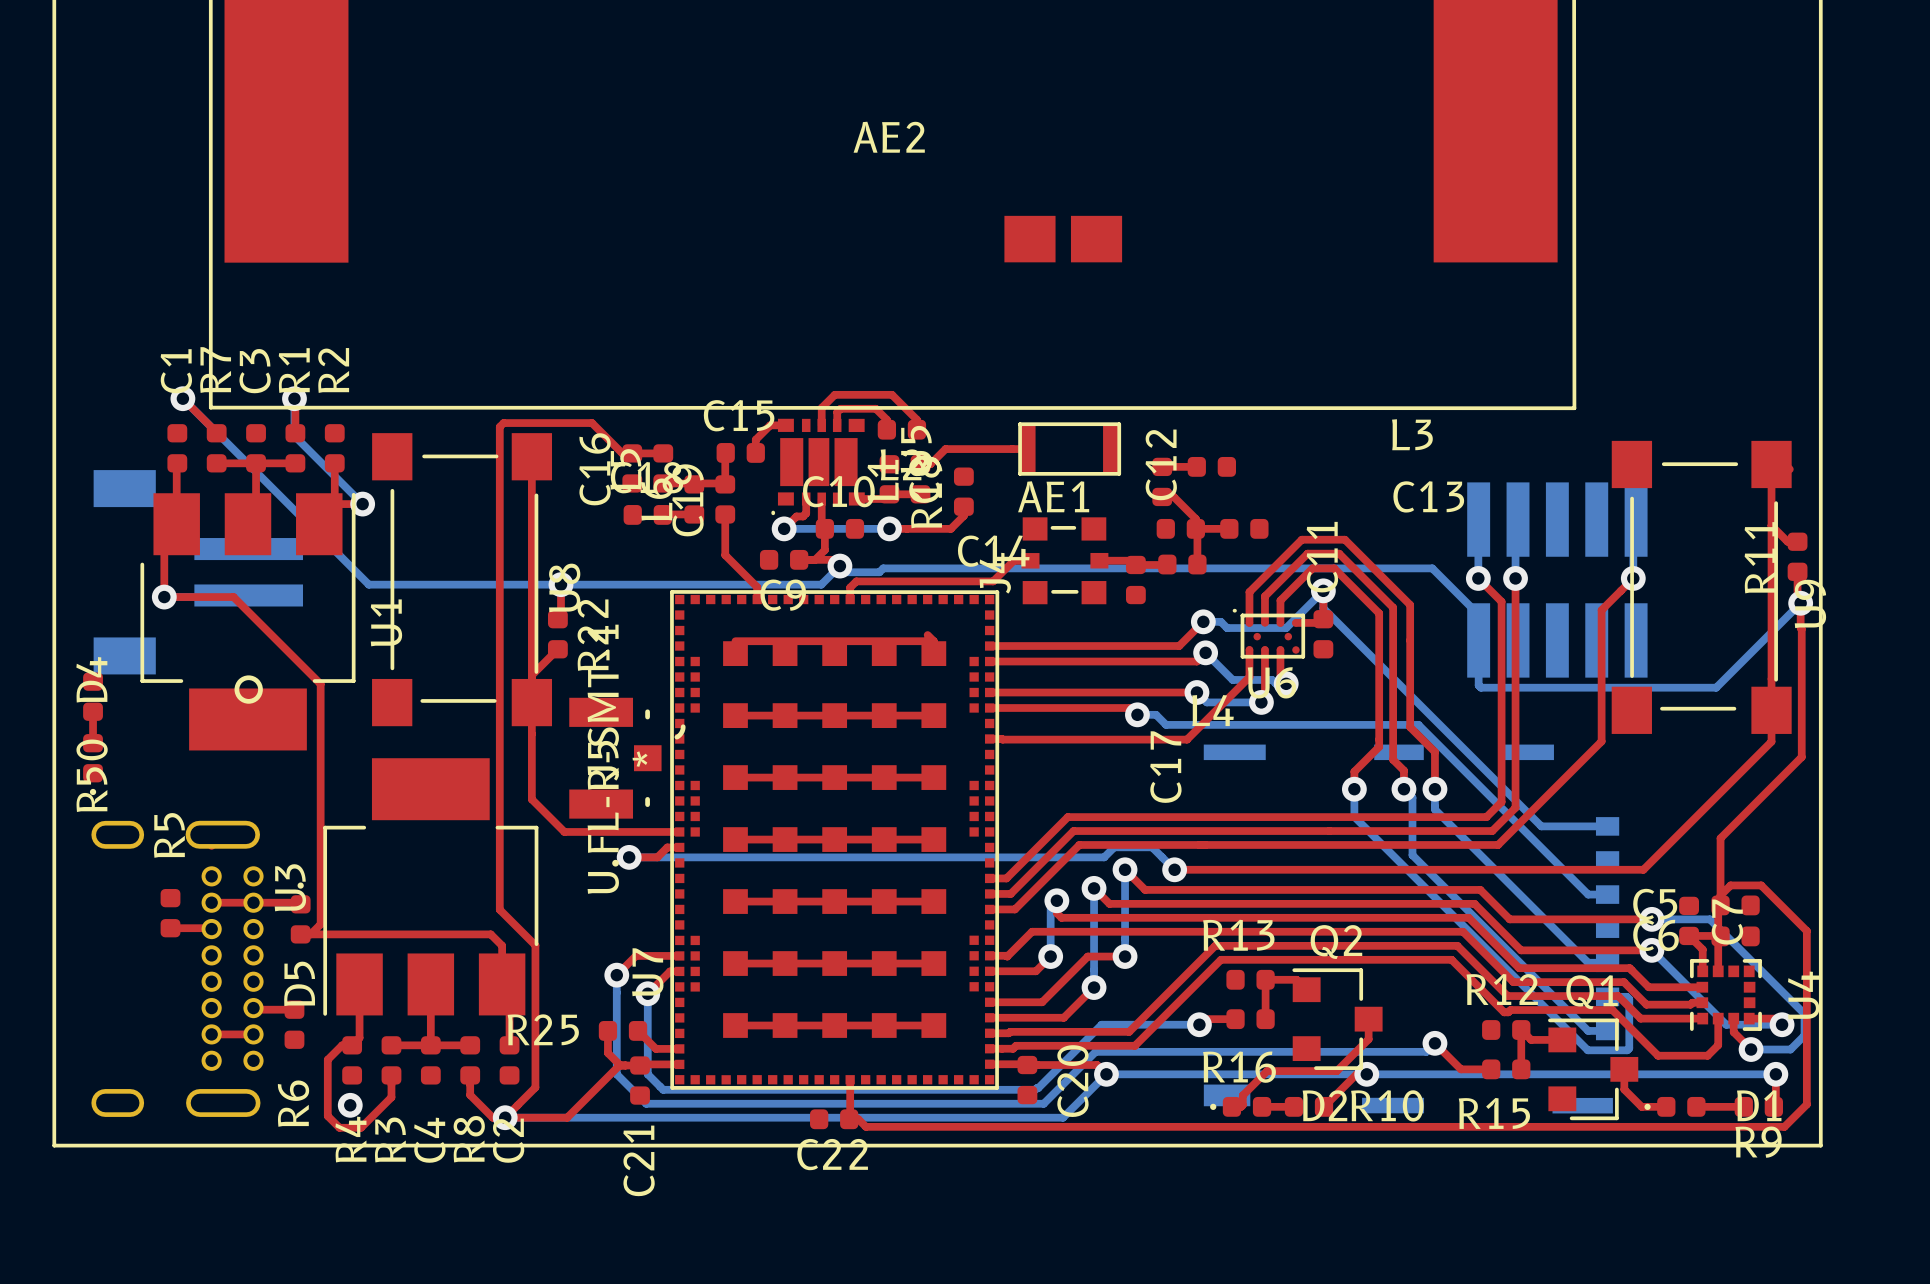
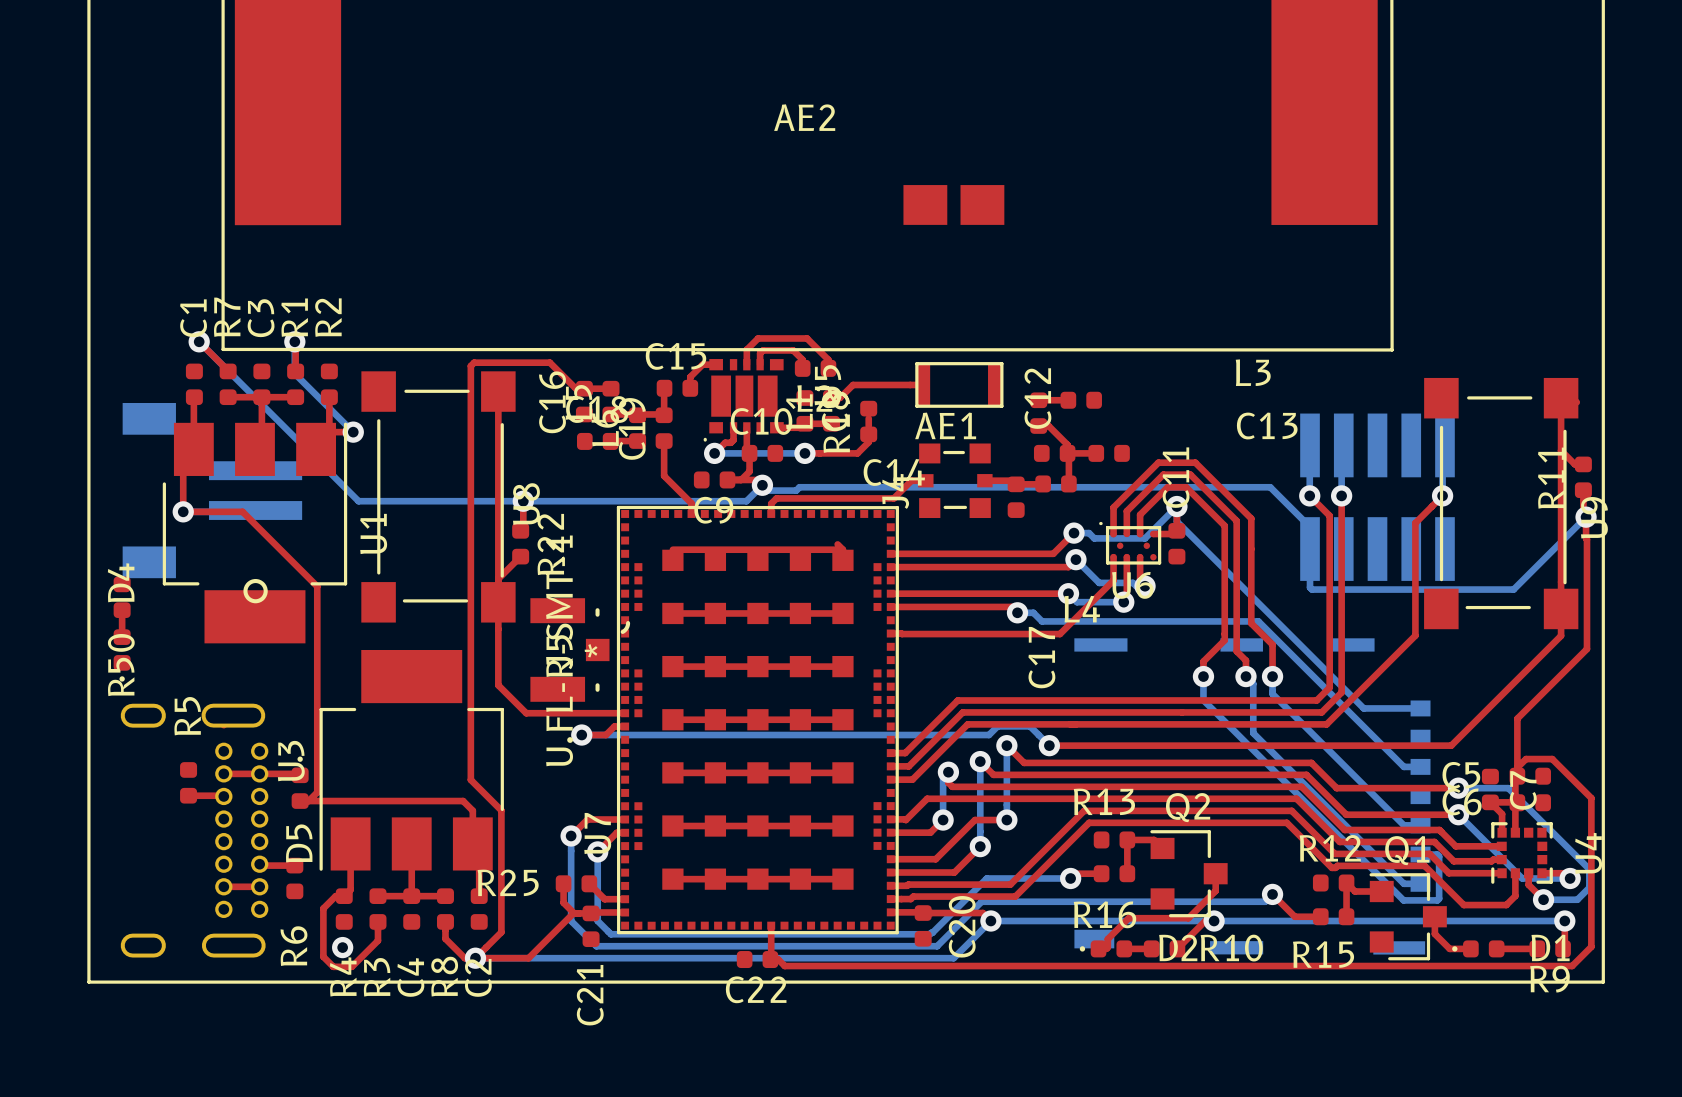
top track: none -> (868, 418) (868, 426)

